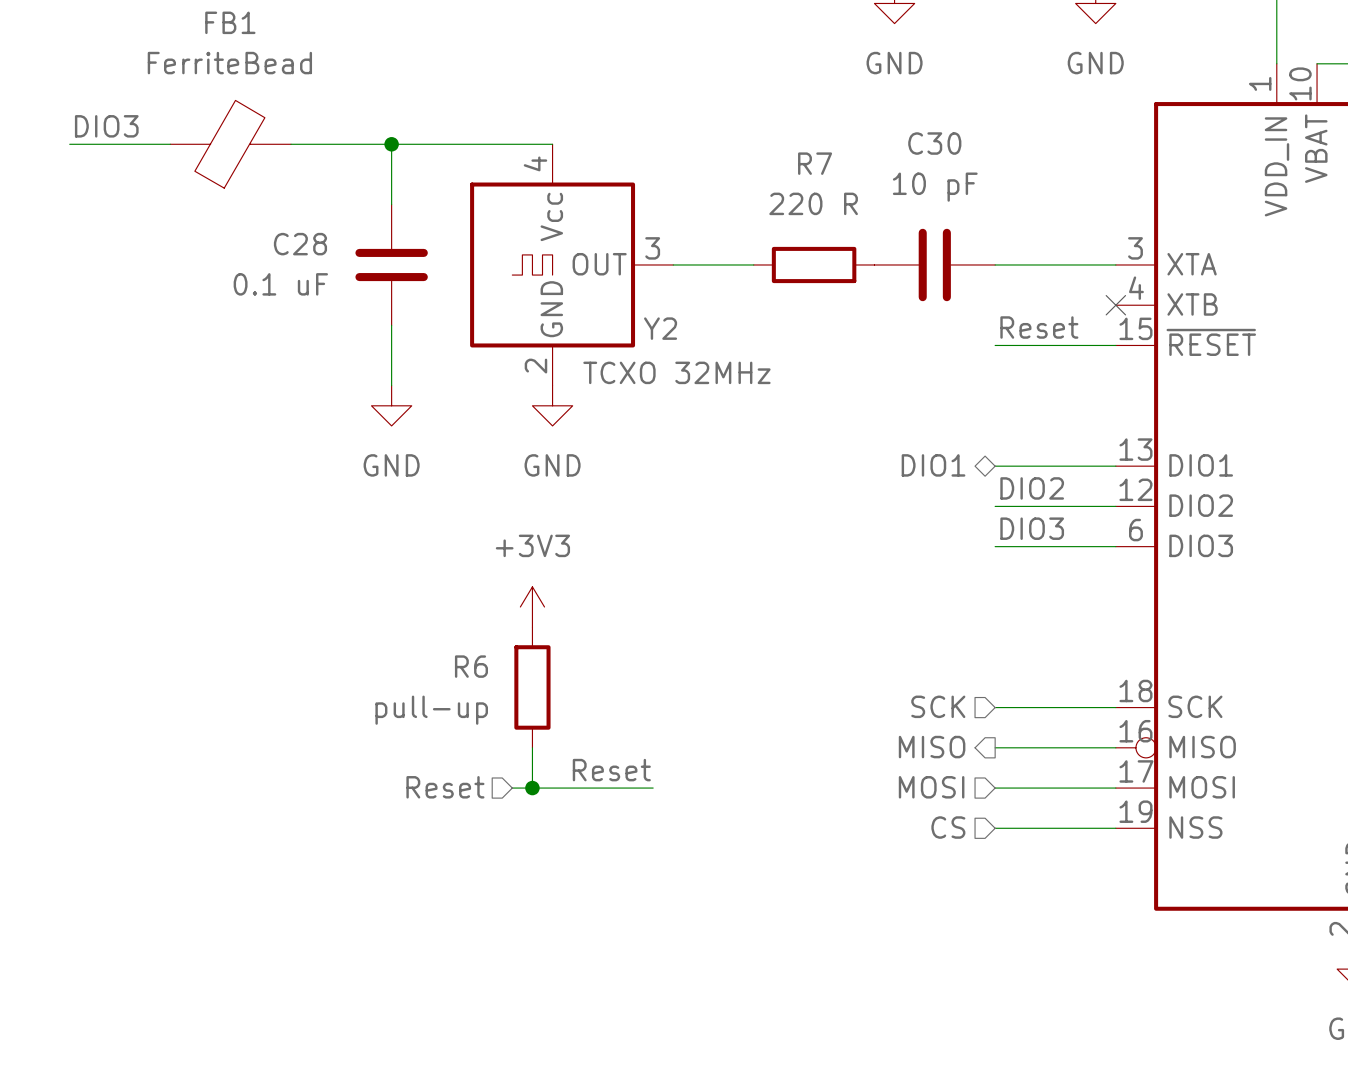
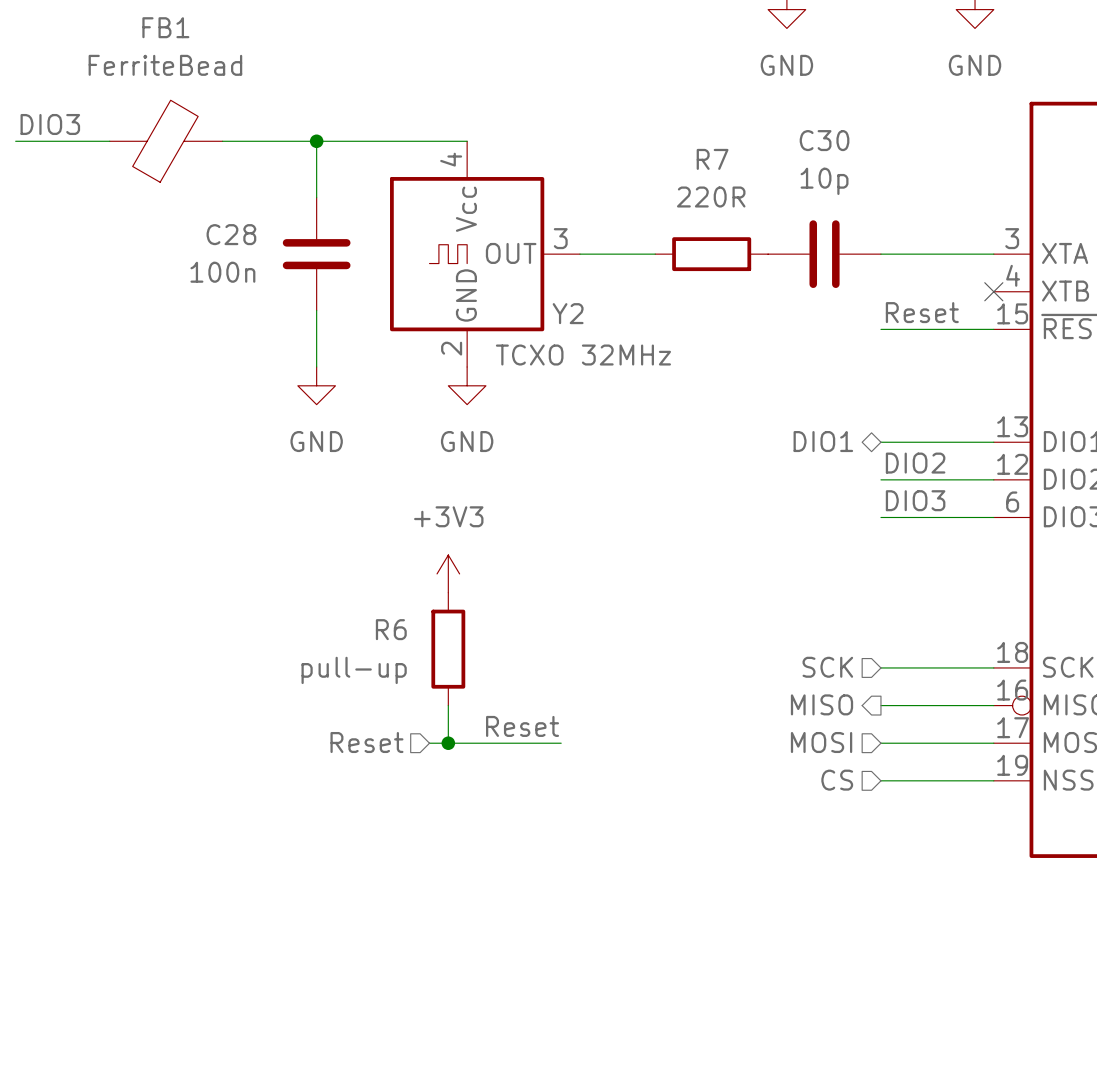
C30 value: 10 pF (935, 187) -> 10p (824, 181)
R7 value: 220 R (813, 203) -> 220R (711, 197)
C28 value: 0.1 uF (280, 284) -> 100n (222, 272)

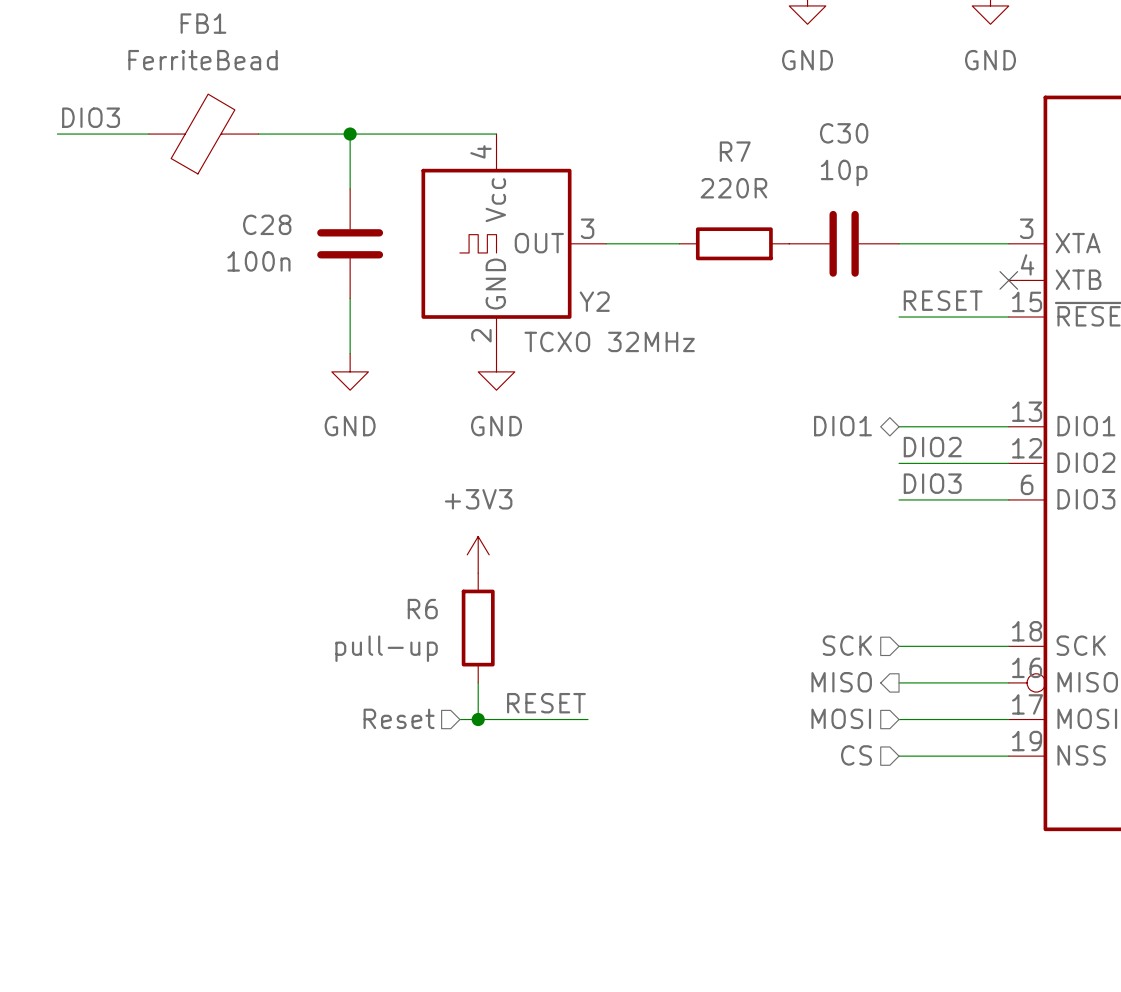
label: Reset (922, 312) -> RESET (943, 300)
label: Reset (522, 726) -> RESET (546, 703)

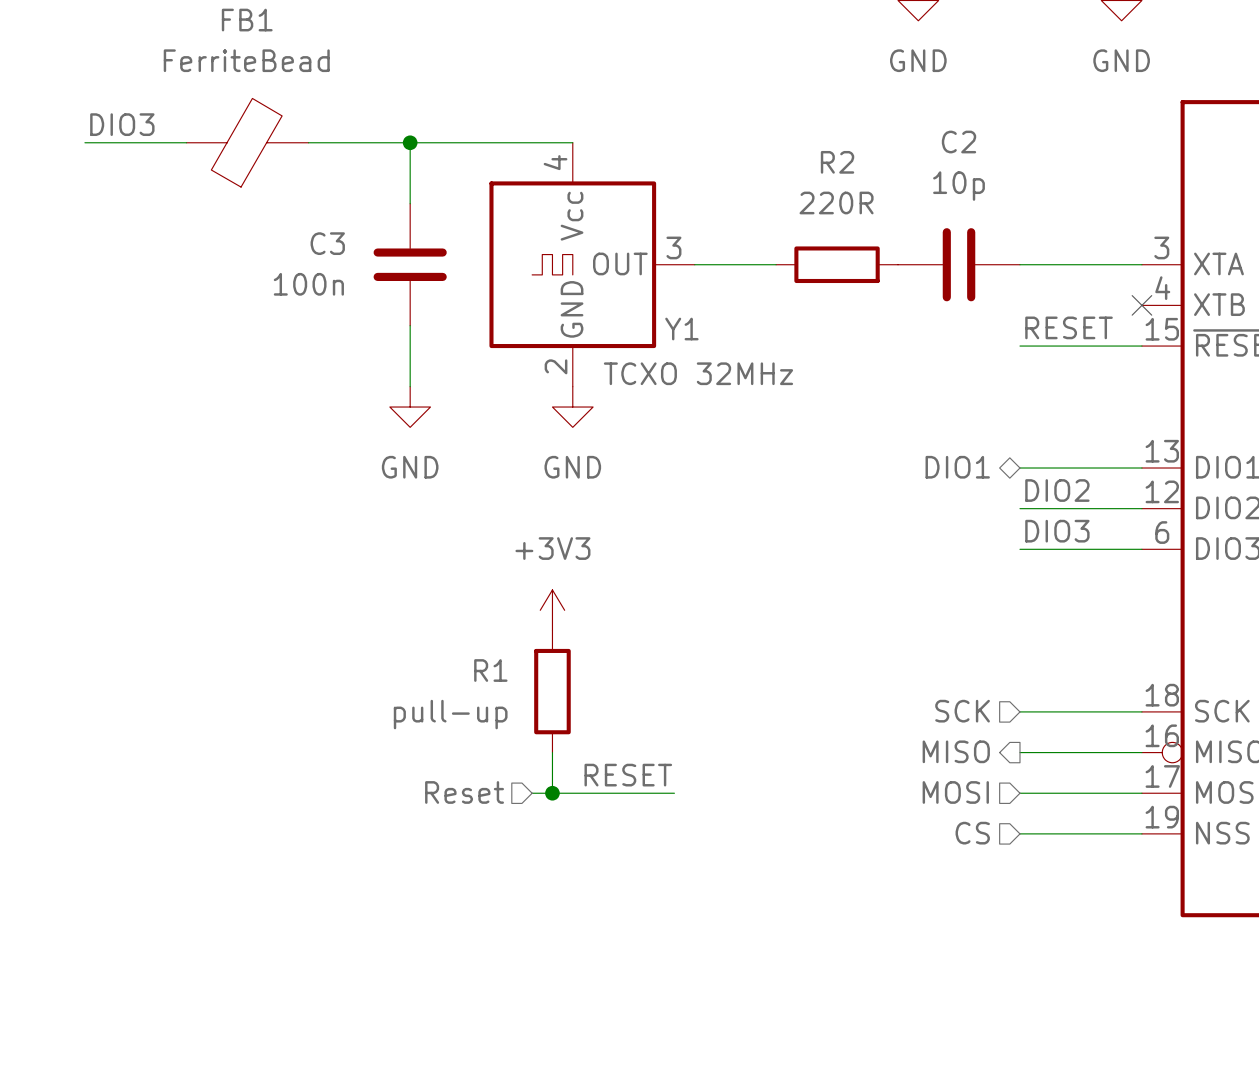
C30 name: C30 (844, 133) -> C2 (959, 142)
R7 name: R7 (735, 151) -> R2 (837, 162)
C28 name: C28 (267, 224) -> C3 (327, 243)
Y2 name: Y2 (594, 301) -> Y1 (681, 329)
R6 name: R6 (422, 609) -> R1 (490, 670)

